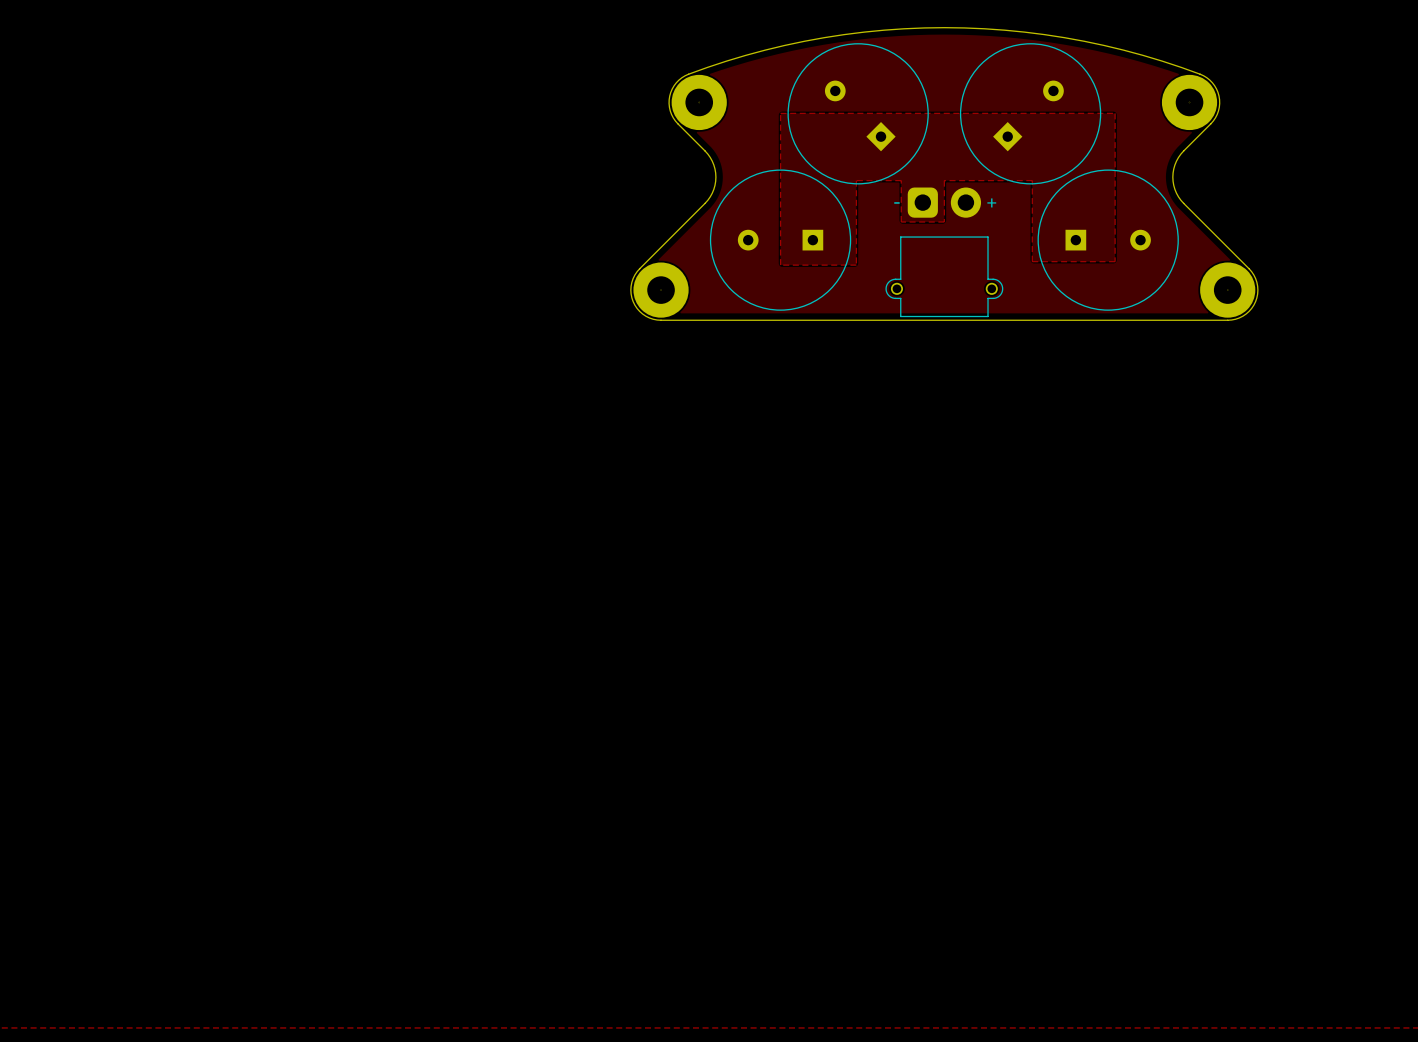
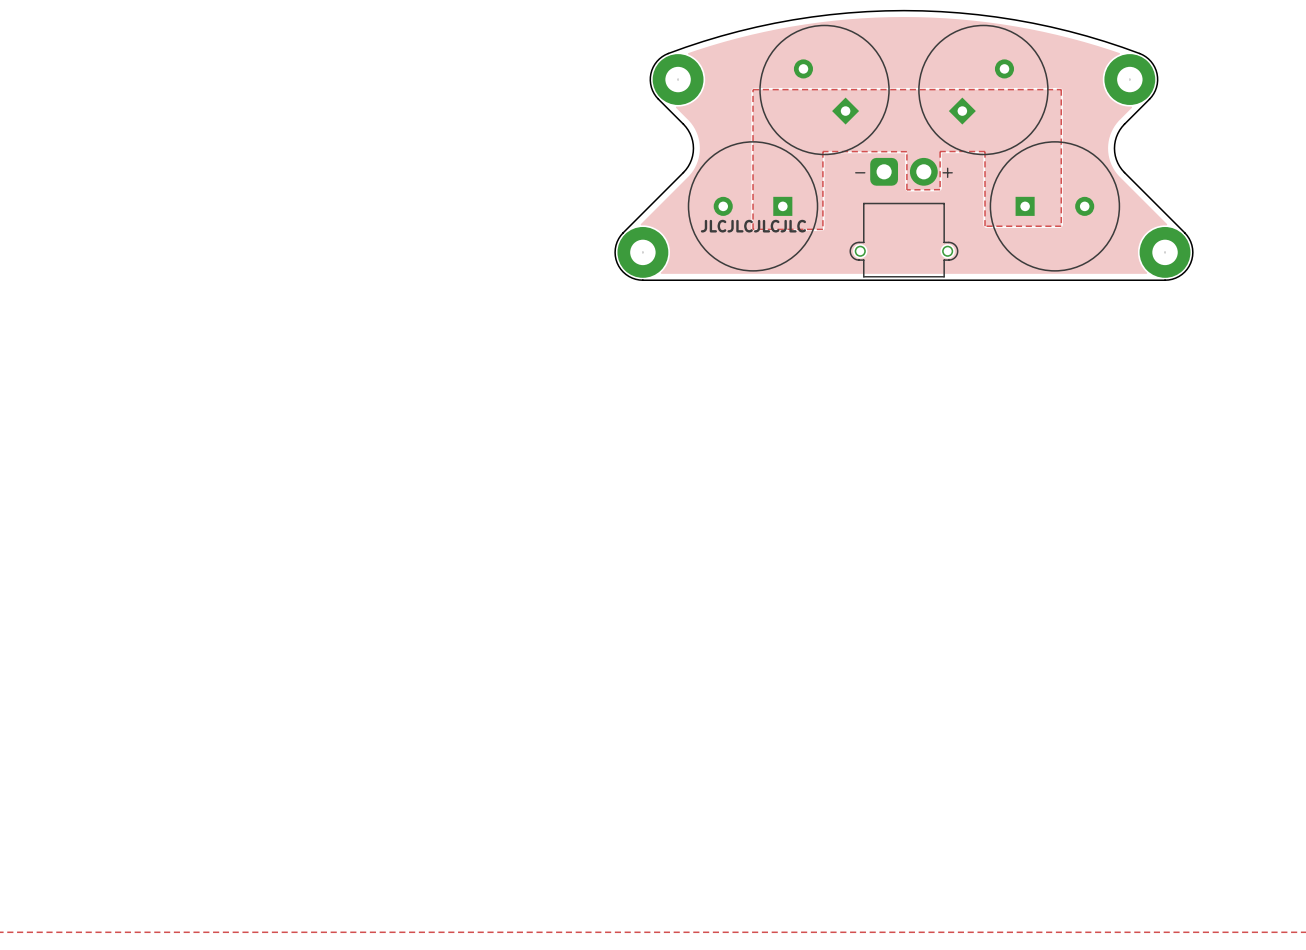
zone outline: (856, 180) (901, 180) (901, 222) (944, 222) (944, 180) (983, 180) -> (822, 151) (906, 151) (906, 189) (940, 189) (940, 151)
text: none -> JLCJLCJLCJLC (753, 226)

